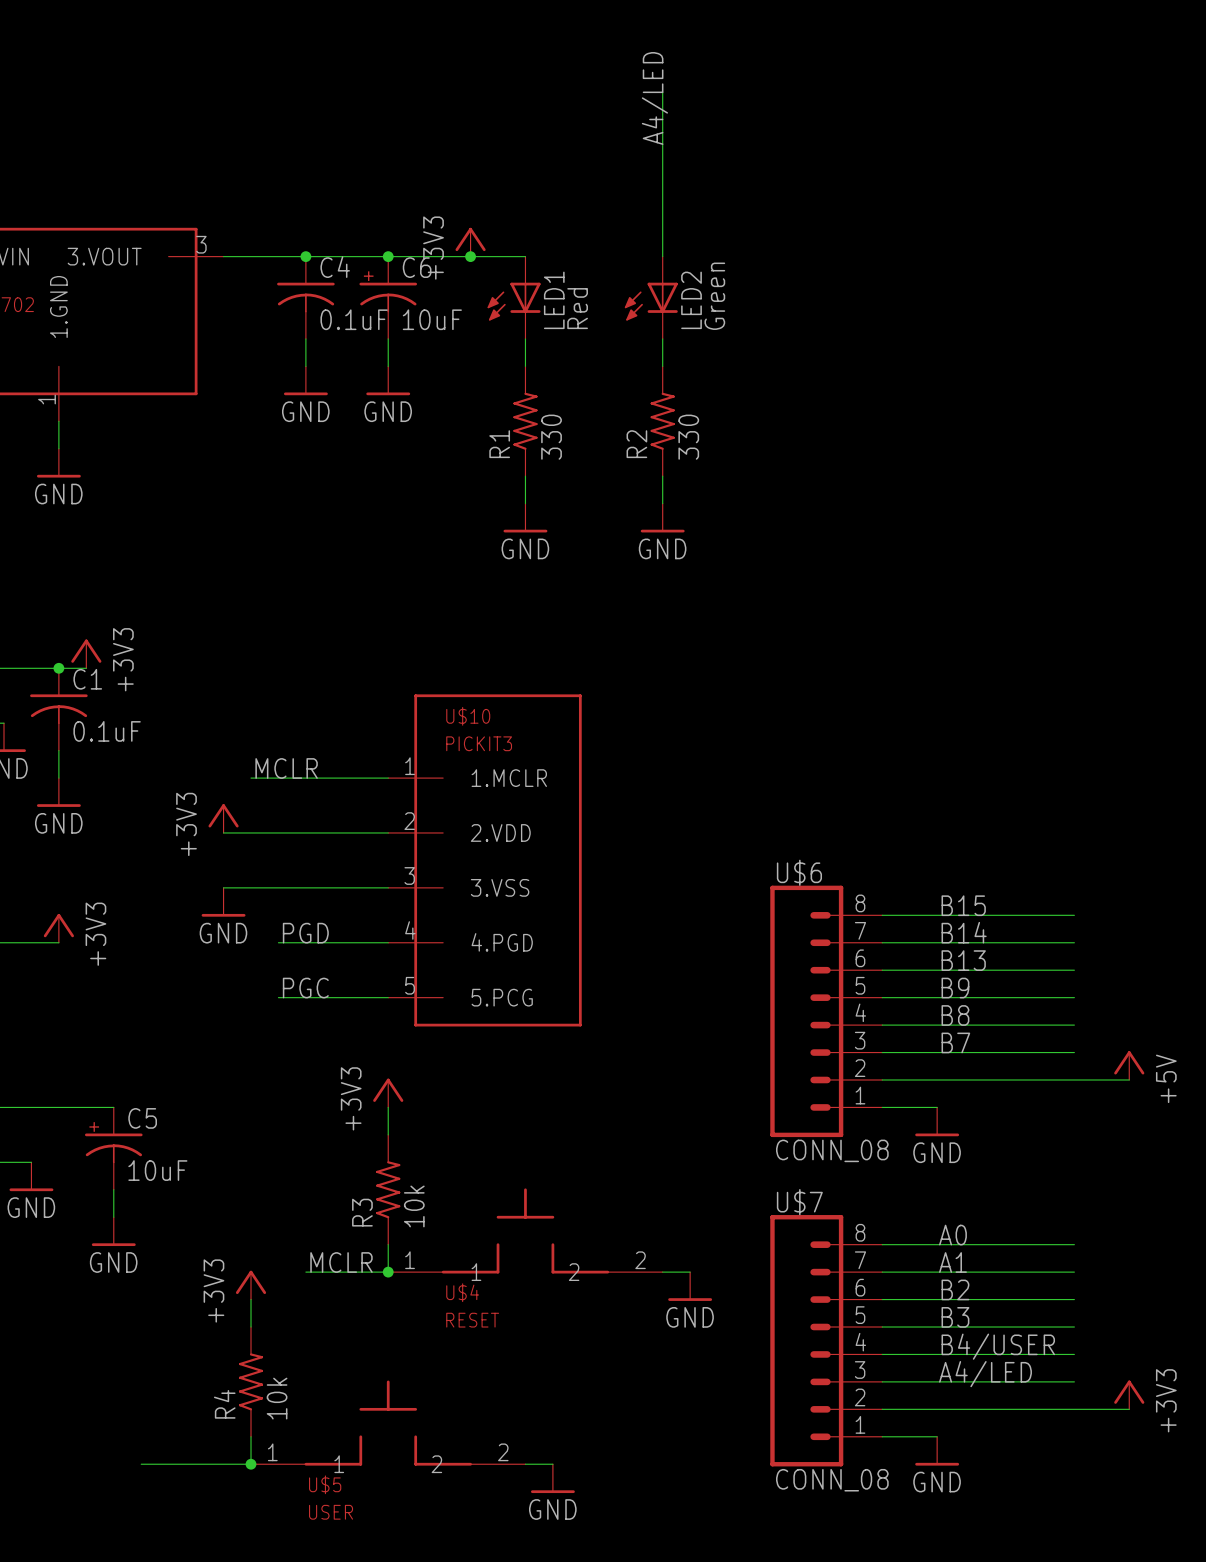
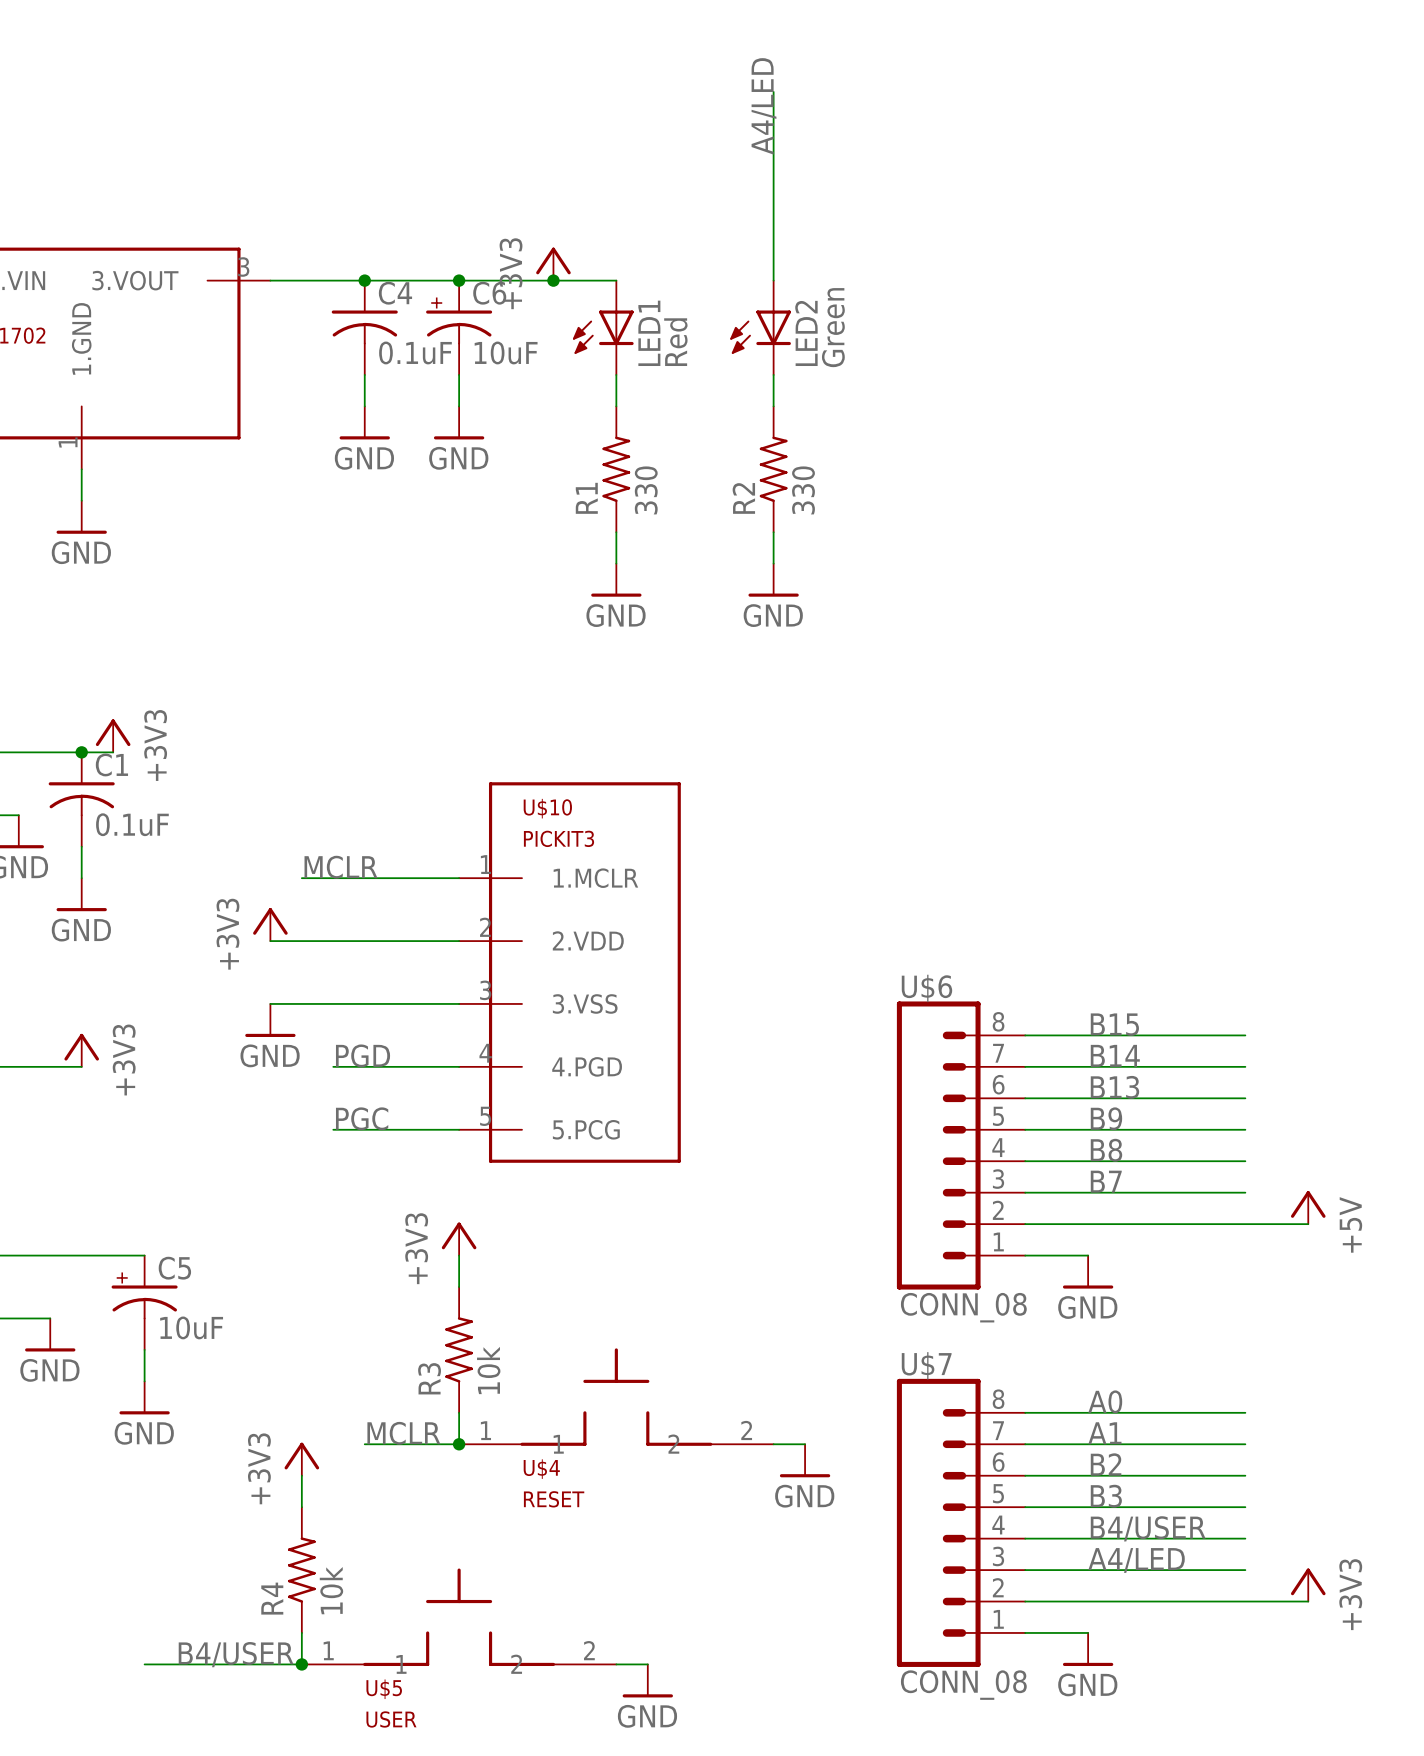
label: none -> B4/USER (236, 1654)
wire: none -> (144, 1664) (176, 1664)

